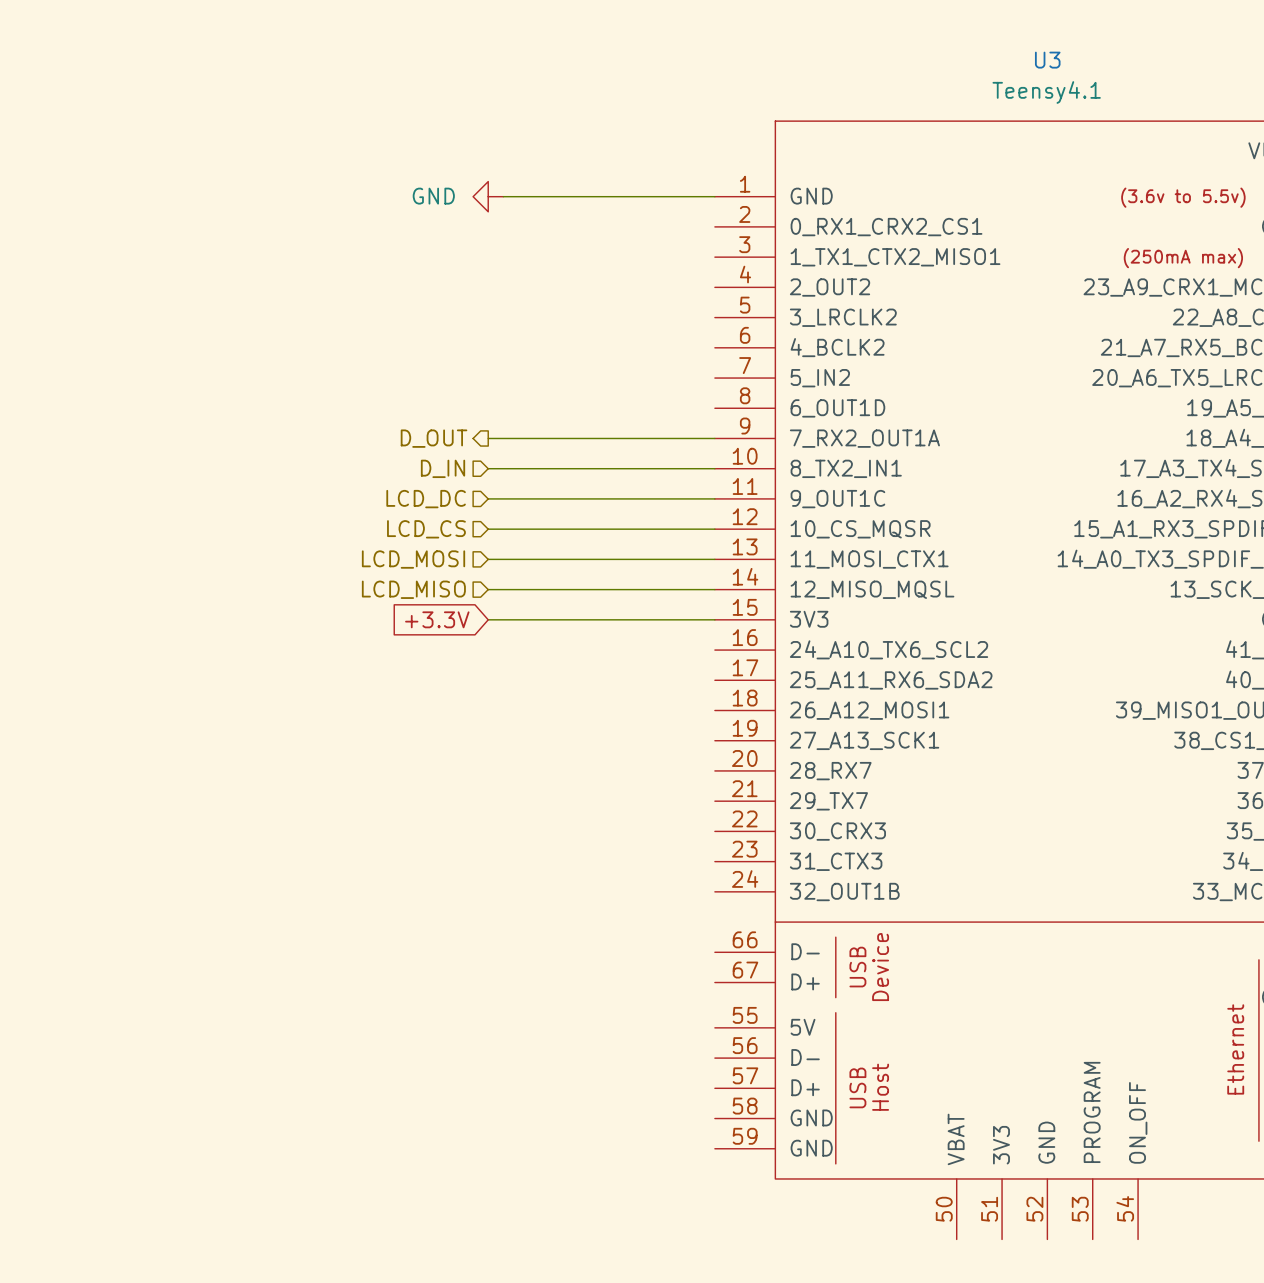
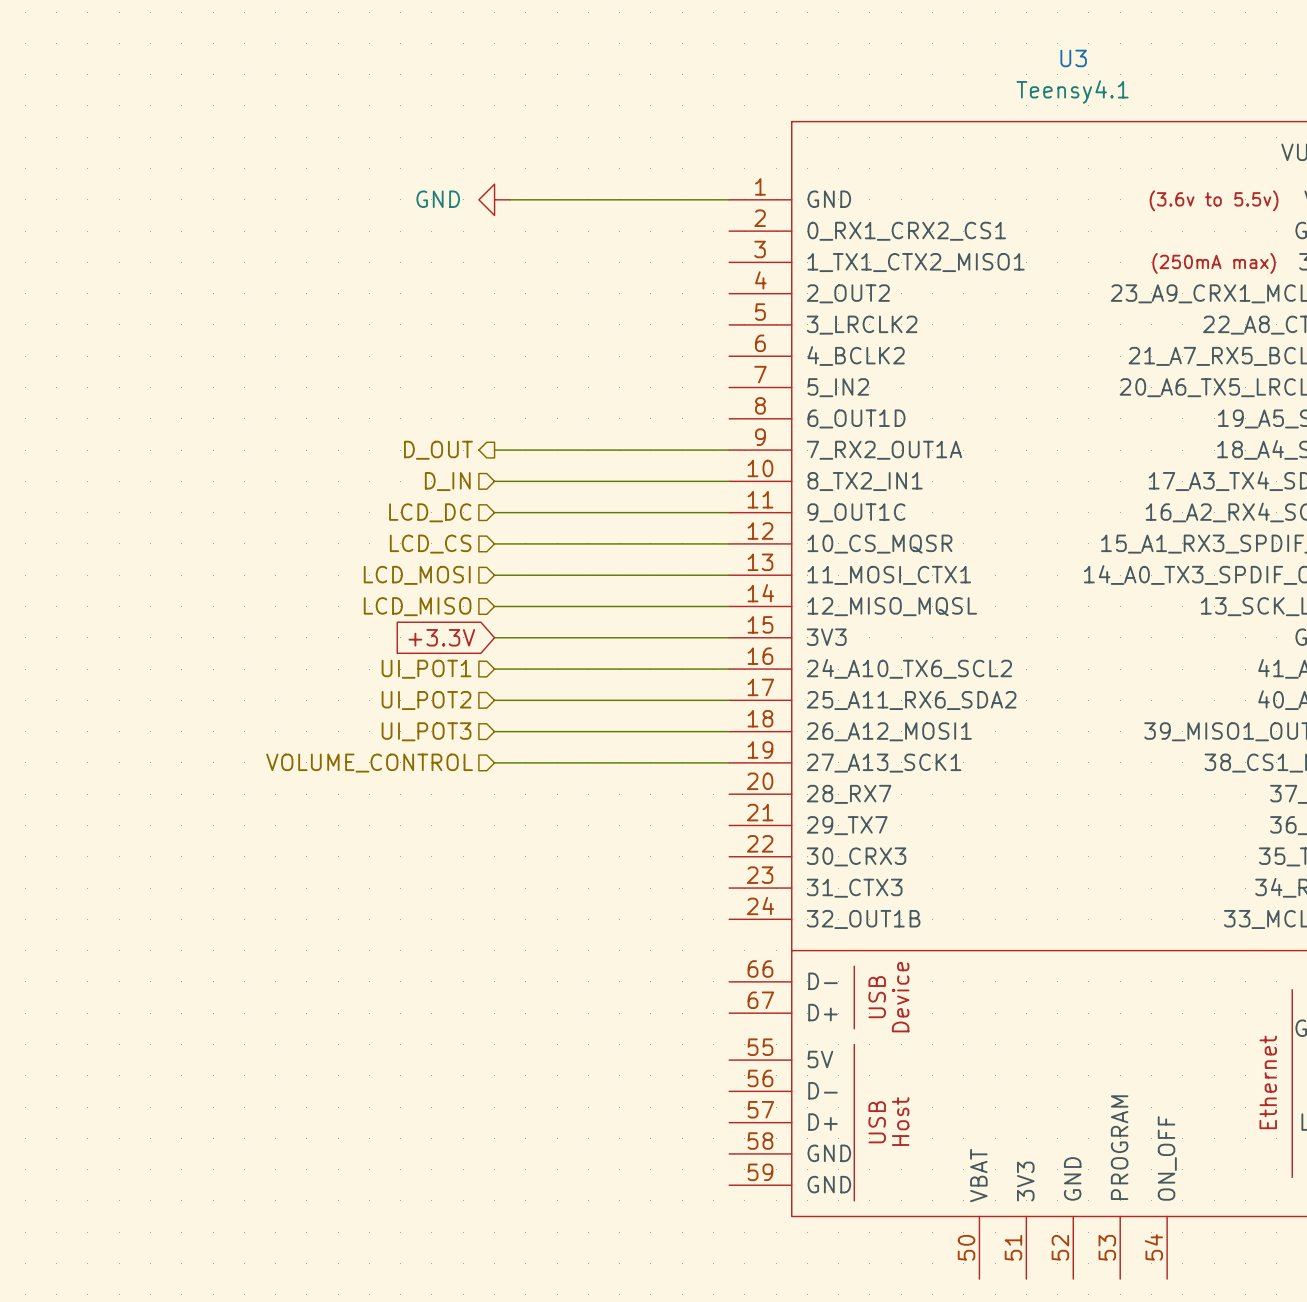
hierarchical label: none -> UI_POT1 (426, 669)
wire: none -> (494, 669) (729, 669)
hierarchical label: none -> UI_POT2 (426, 700)
wire: none -> (494, 700) (729, 700)
hierarchical label: none -> UI_POT3 (426, 731)
wire: none -> (494, 731) (729, 731)
hierarchical label: none -> VOLUME_CONTROL (369, 763)
wire: none -> (494, 762) (729, 762)

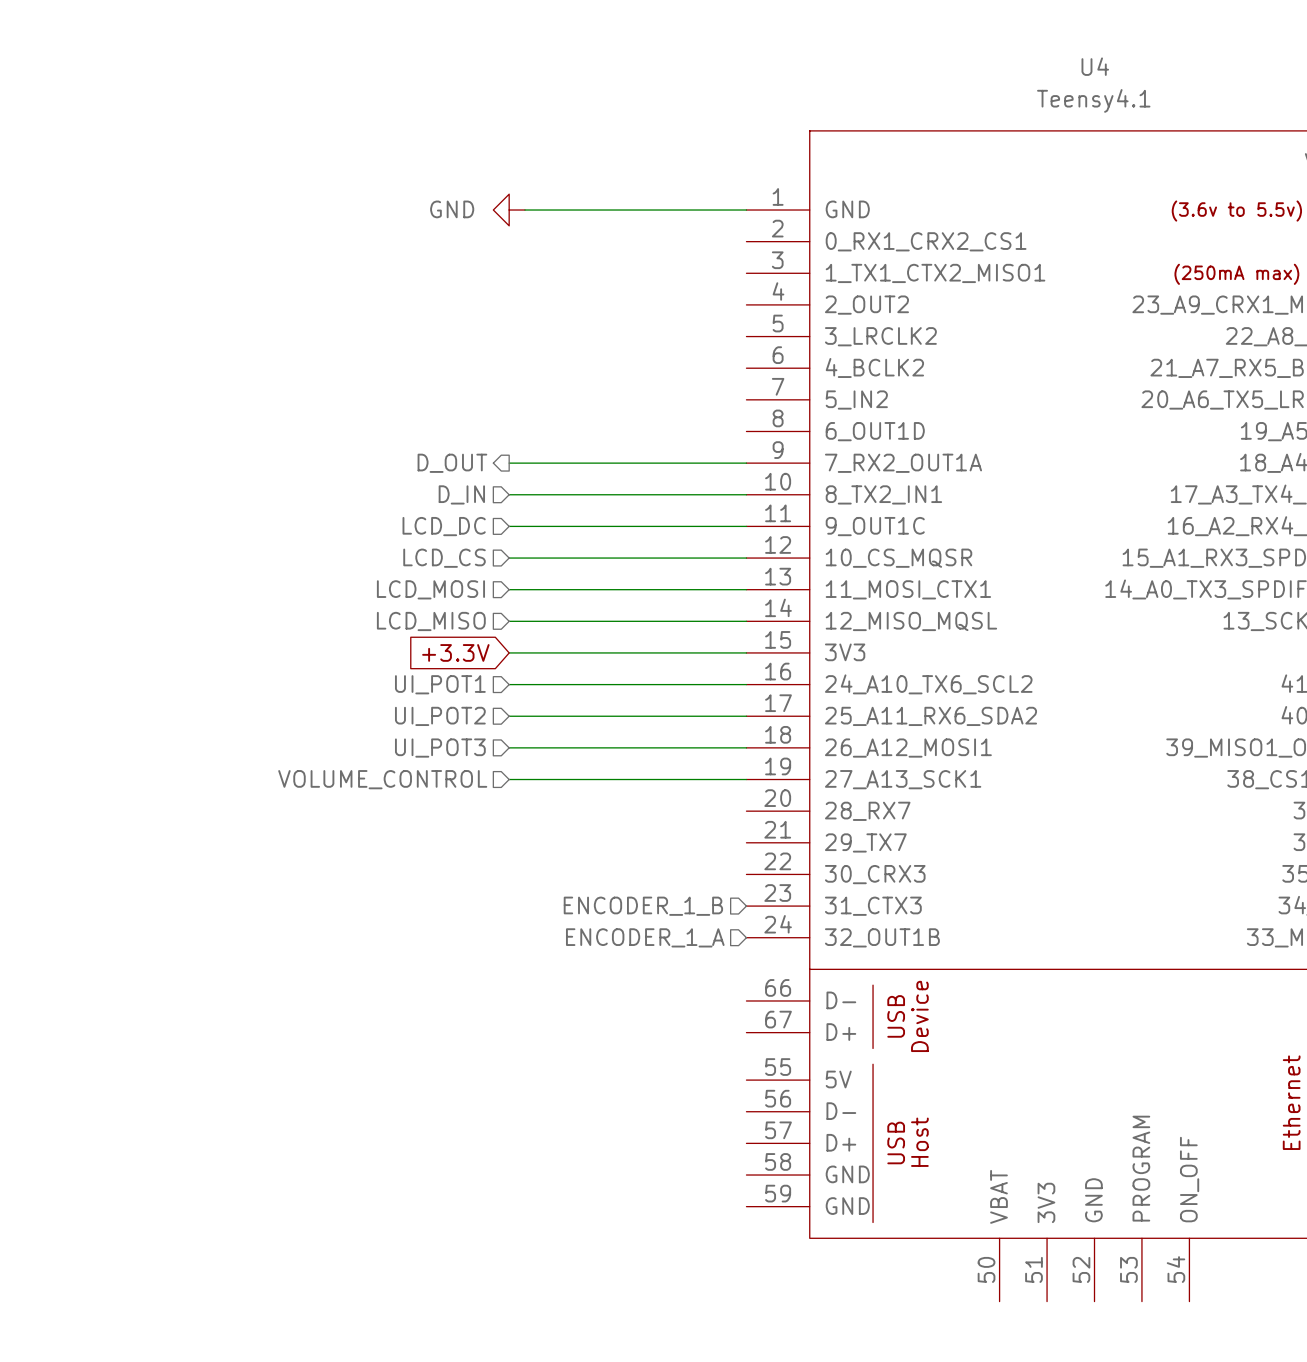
U3 name: U3 (1073, 58) -> U4 (1095, 66)
hierarchical label: none -> ENCODER_1_B (643, 906)
hierarchical label: none -> ENCODER_1_A (645, 937)

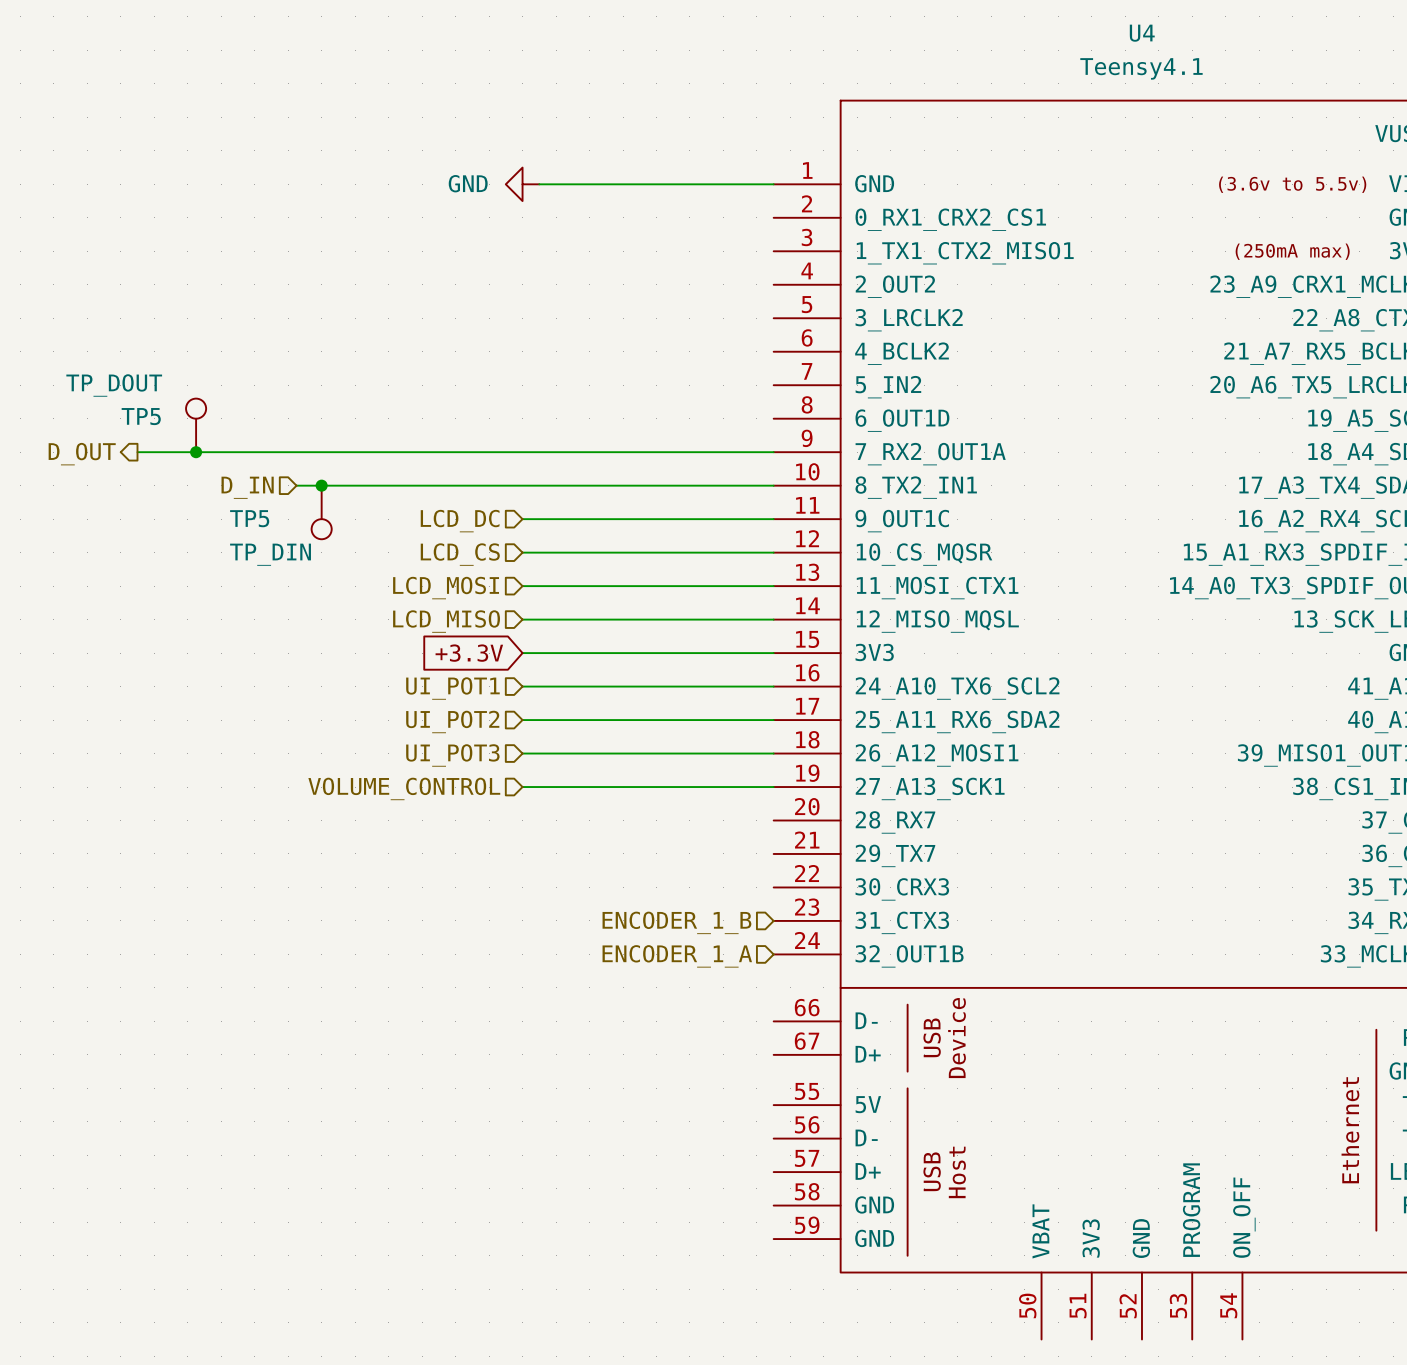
TP5: none -> TP_DOUT (196, 425)
hierarchical label: none -> D_OUT (82, 454)
wire: none -> (137, 452) (522, 452)
junction: none -> (196, 452)
hierarchical label: D_OUT (452, 463) -> none
wire: none -> (296, 485) (522, 485)
junction: none -> (321, 485)
hierarchical label position: D_IN (461, 494) -> D_IN (247, 487)
TP5: none -> TP_DIN (321, 512)

